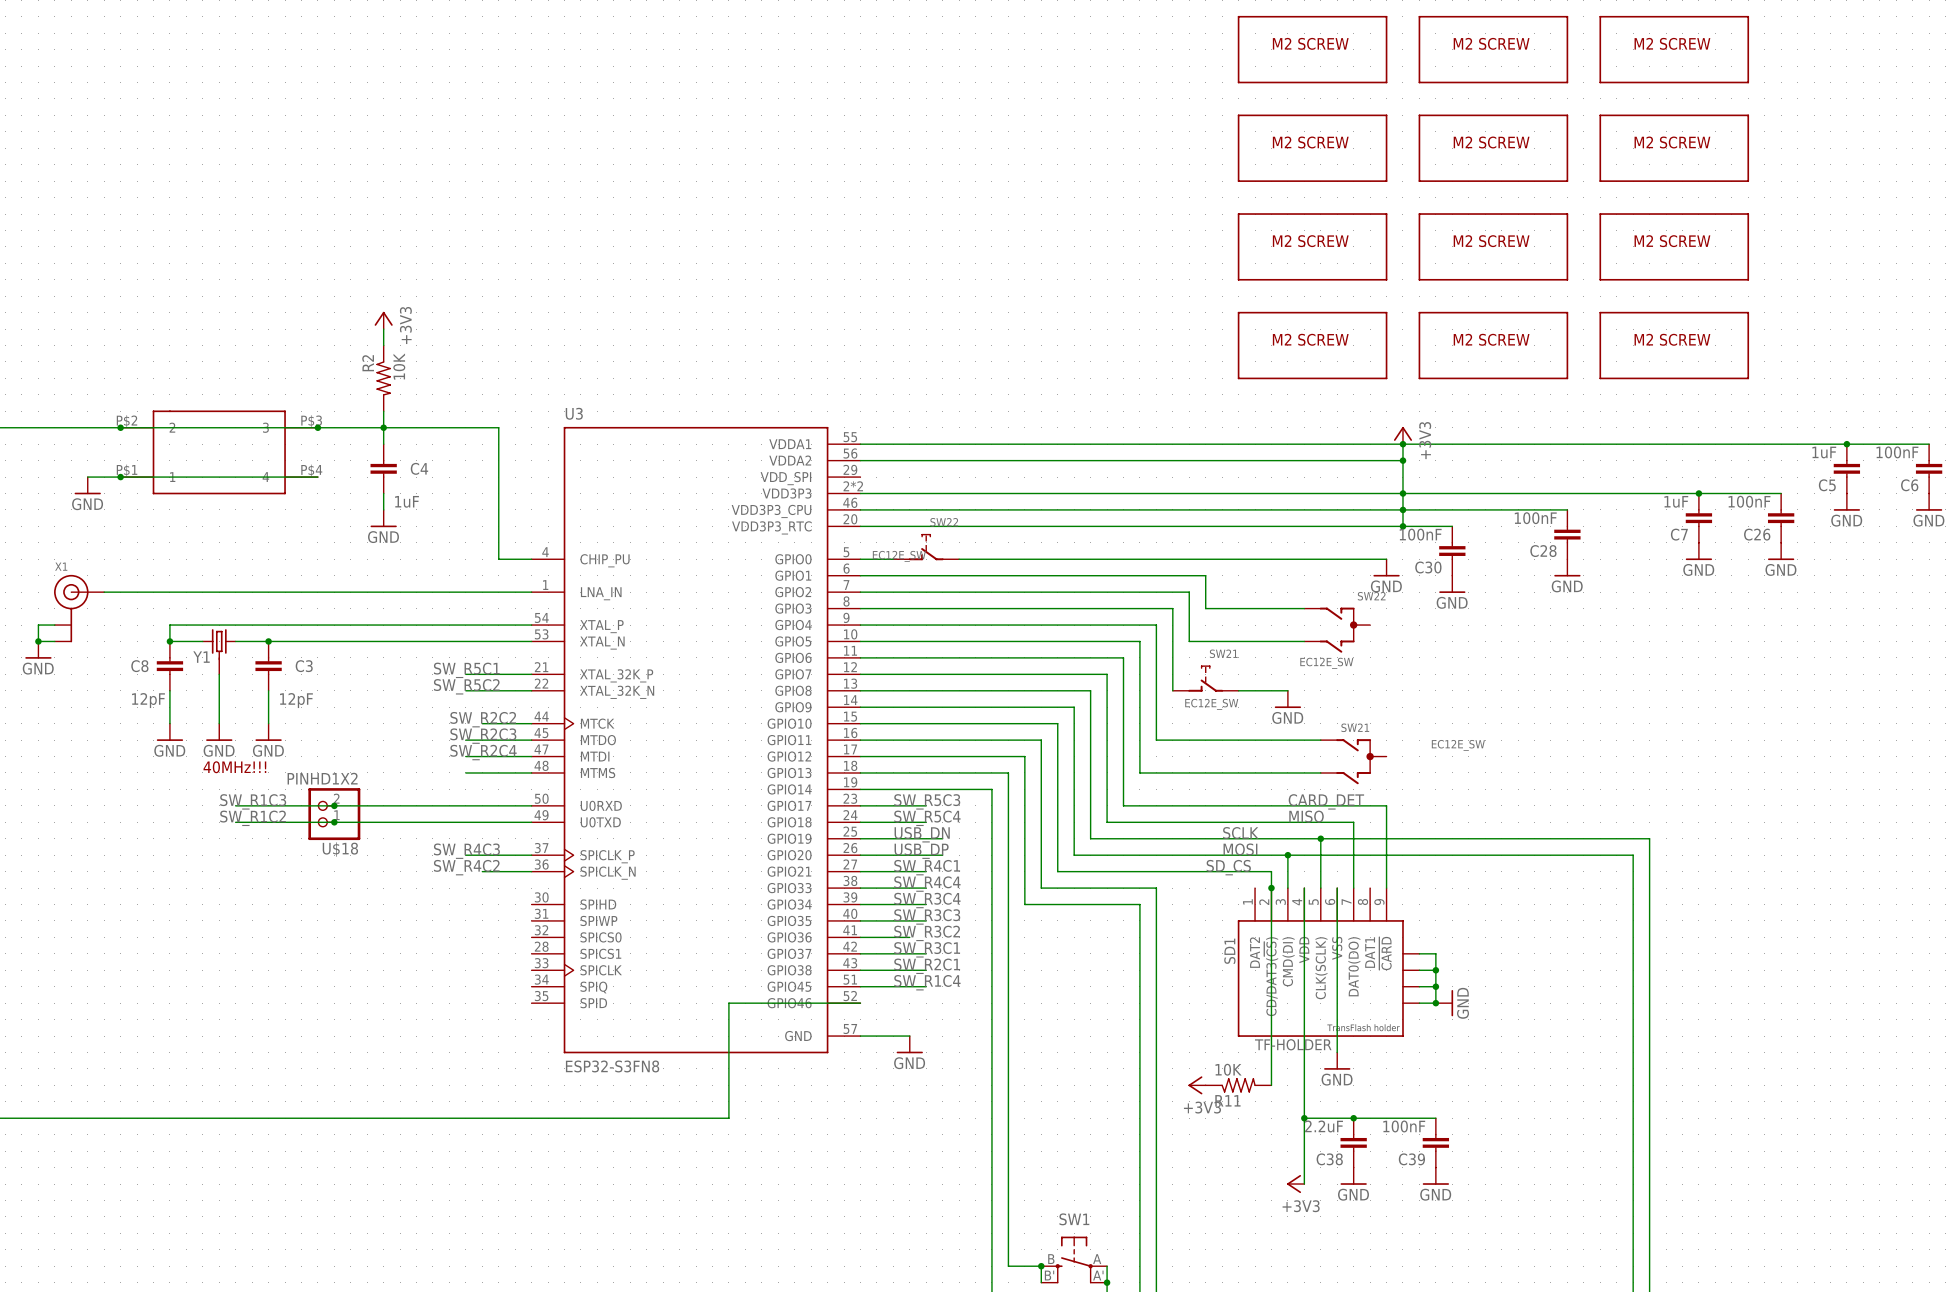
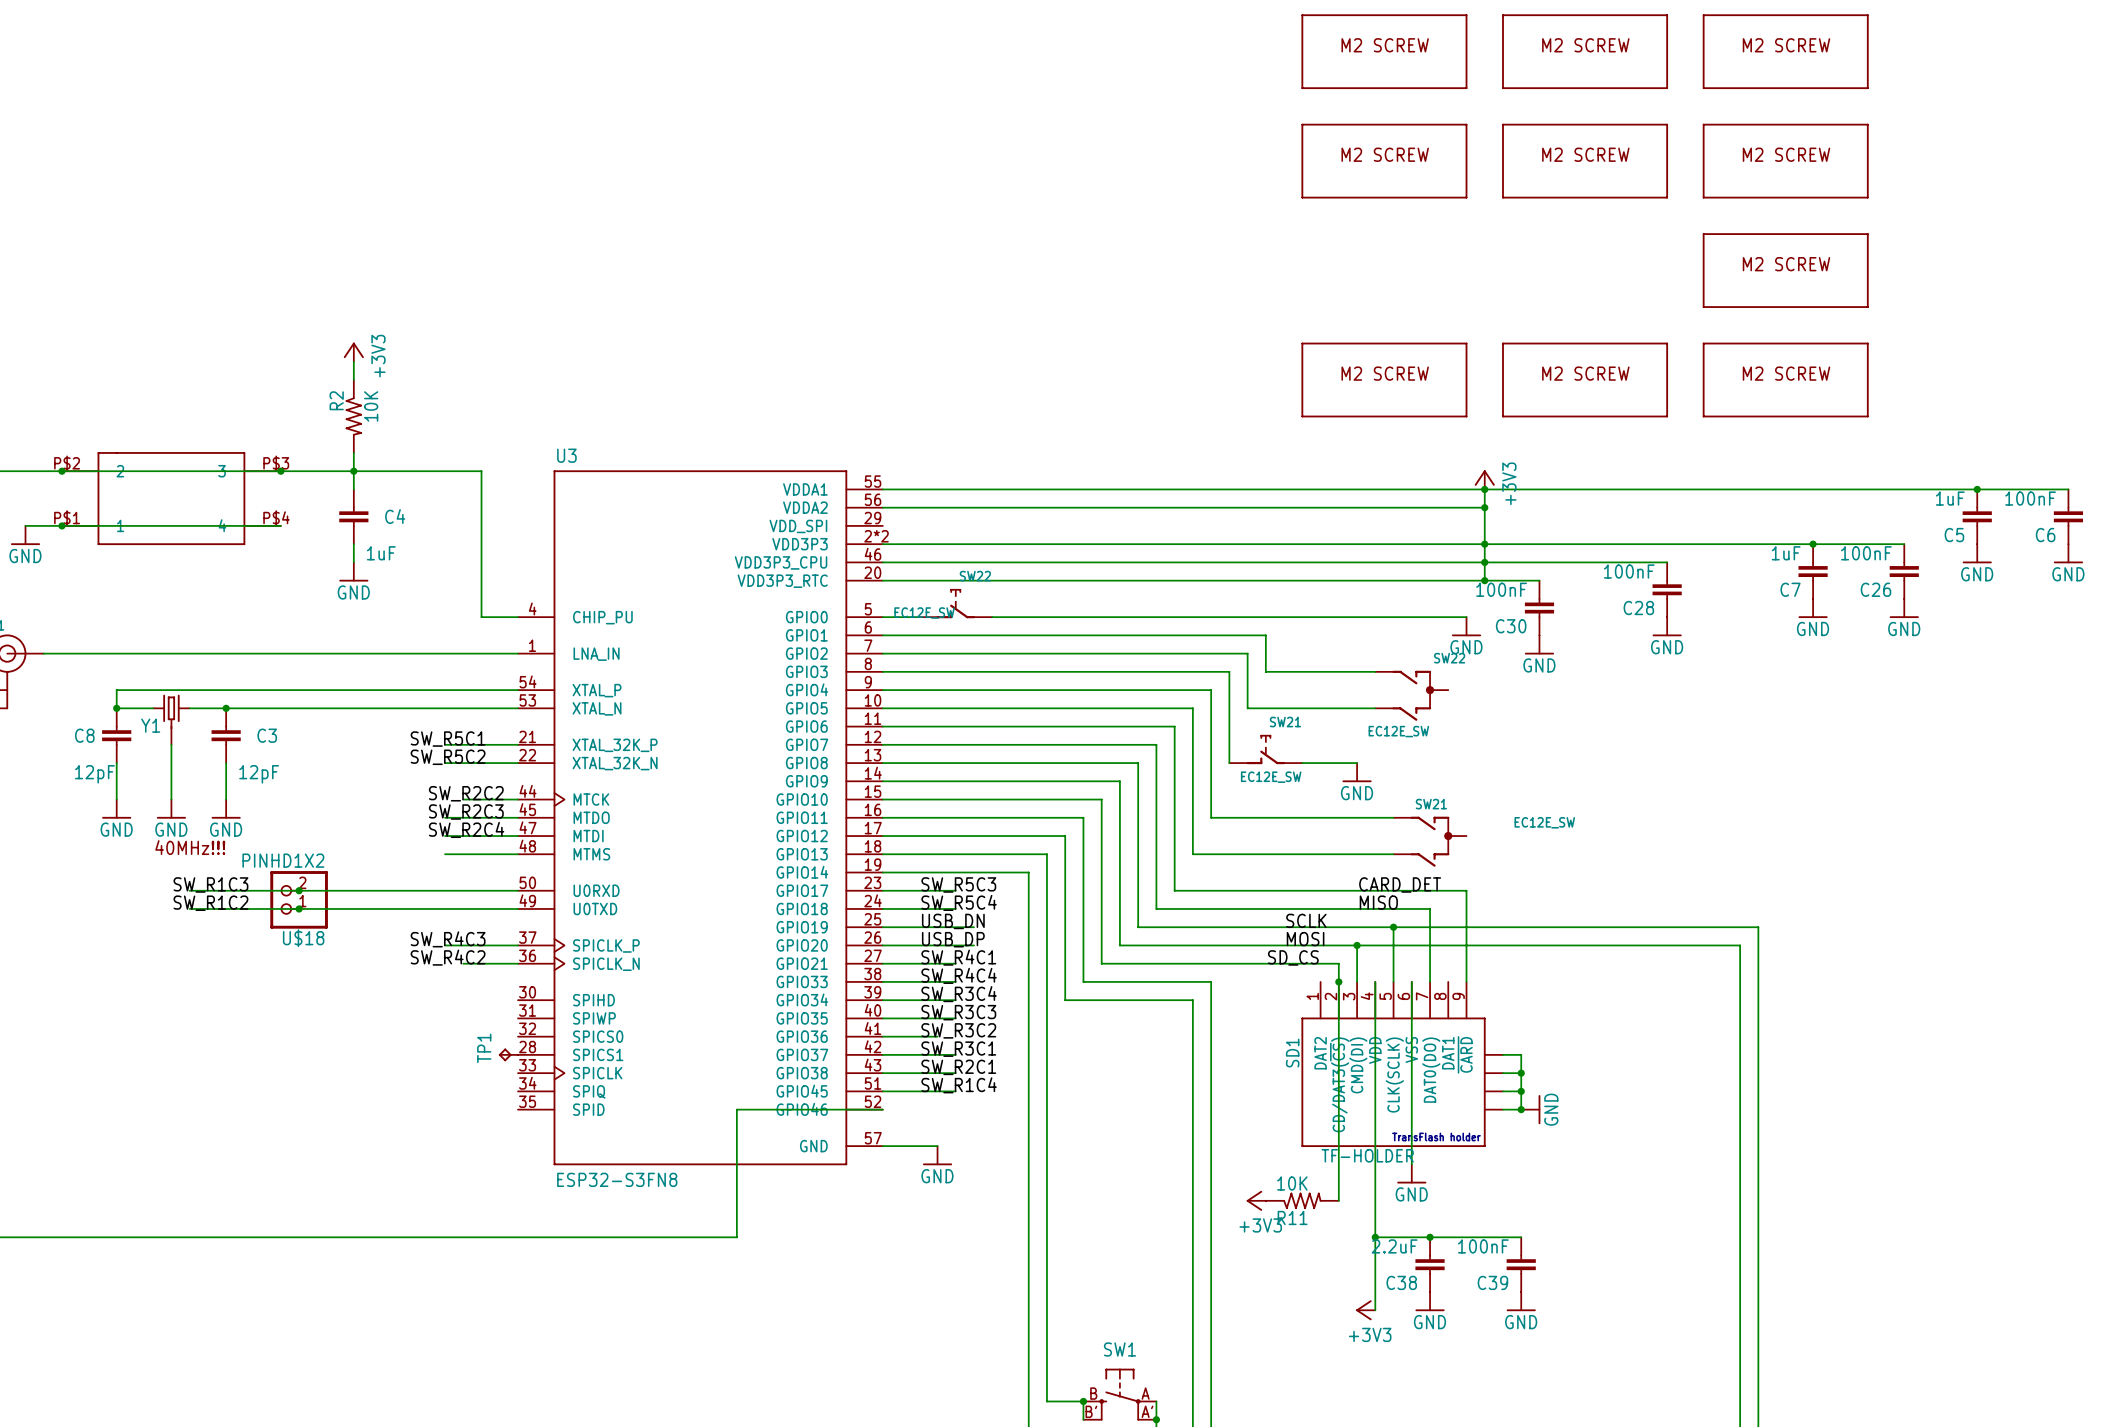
part: (1312, 246) -> none
part: (1493, 246) -> none
TP1: none -> (508, 1054)

